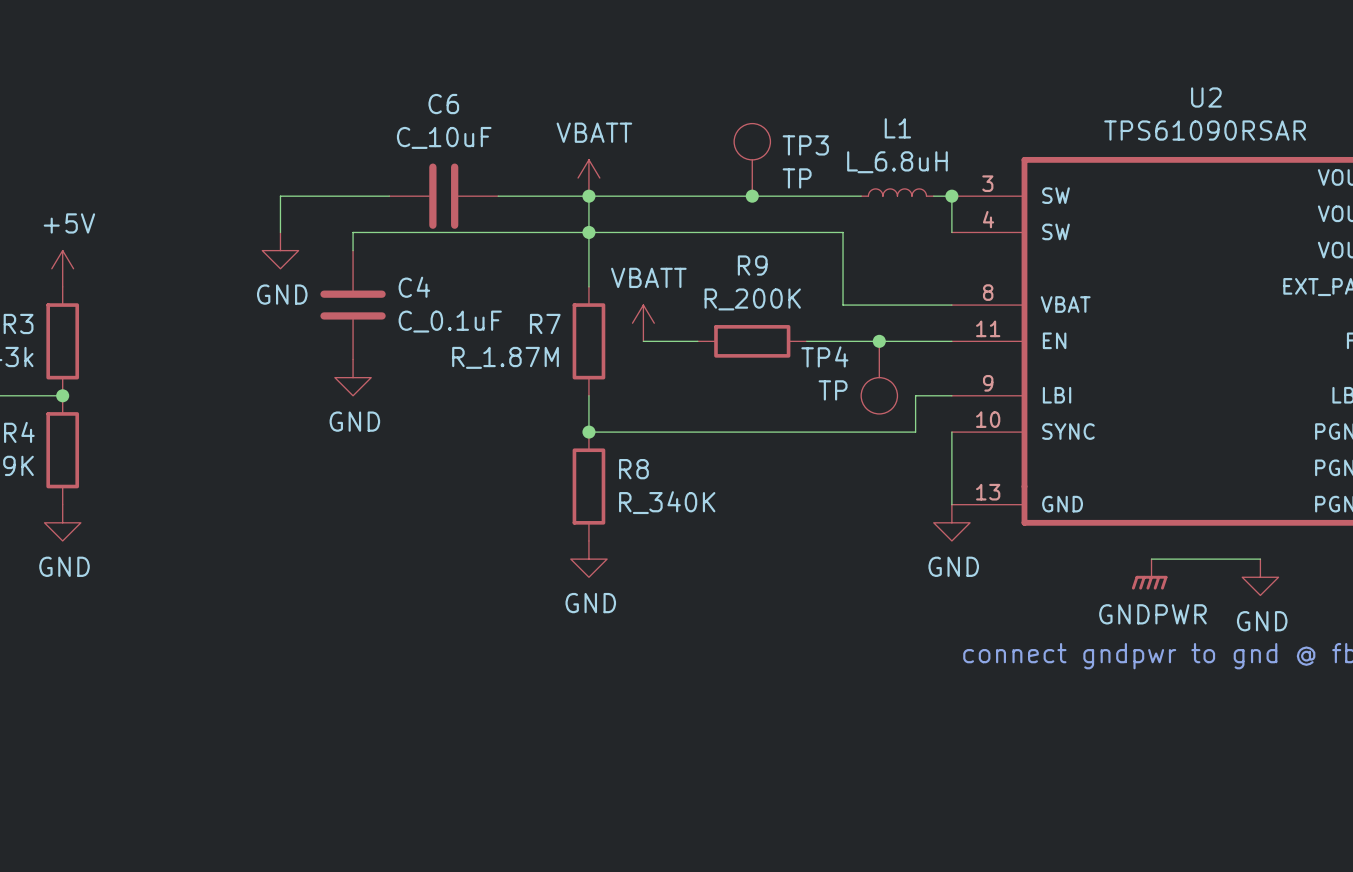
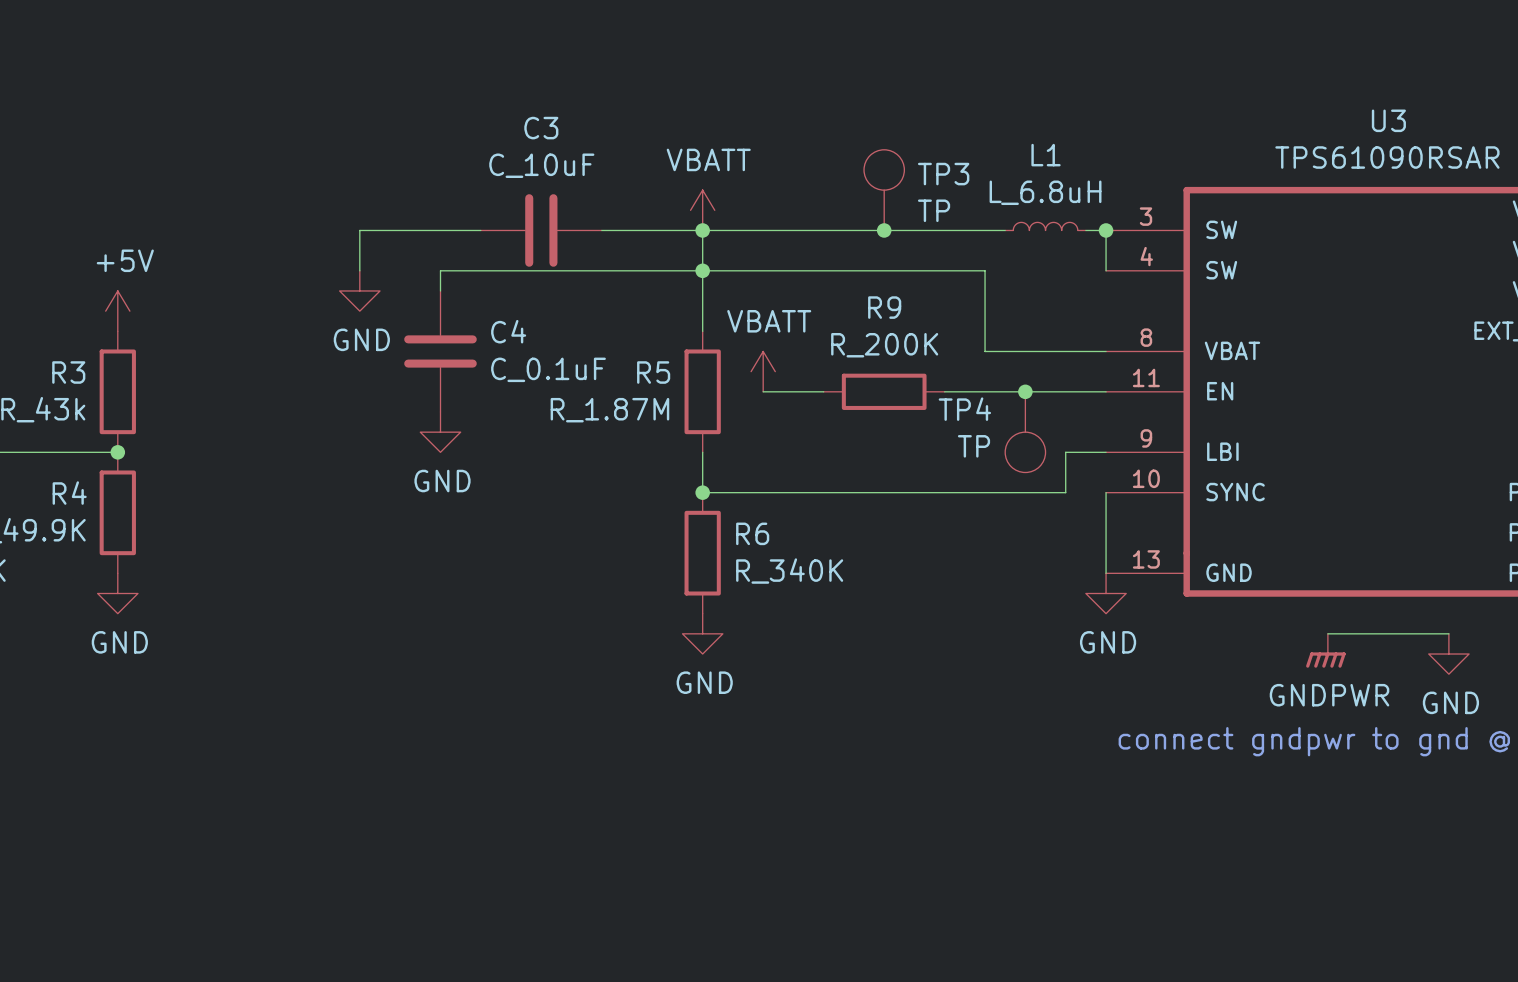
U2 name: U2 (1206, 97) -> U3 (1388, 120)
C6 name: C6 (443, 104) -> C3 (541, 128)
R7 name: R7 (545, 323) -> R5 (653, 372)
R8 name: R8 (633, 469) -> R6 (752, 533)

